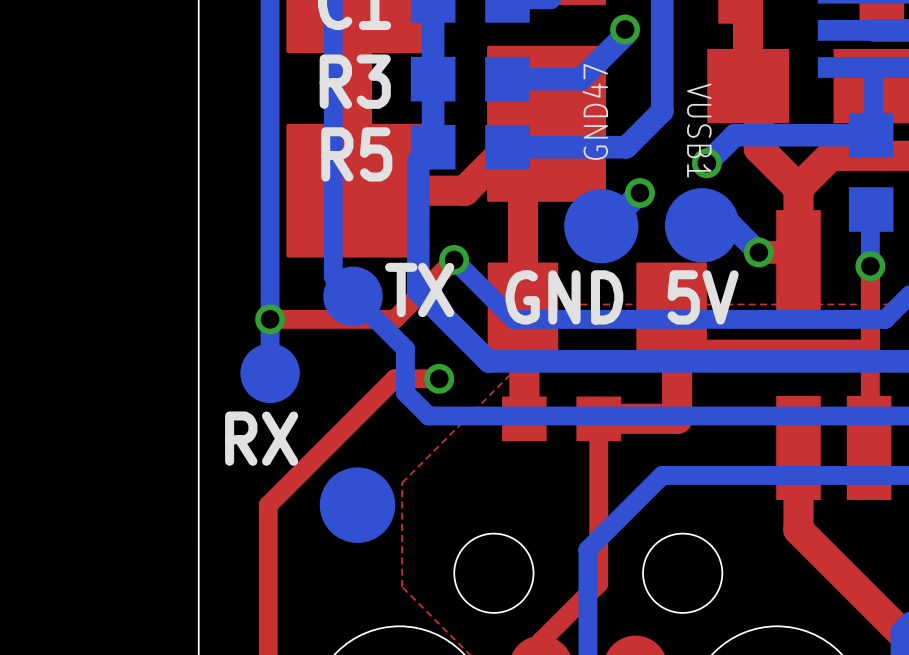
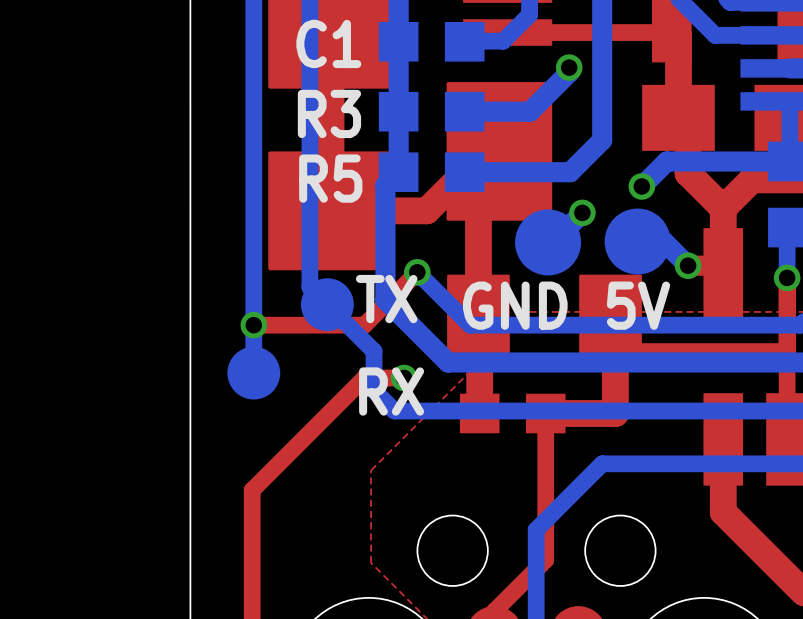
GND47 name: GND47 (595, 111) -> none
VUSB1 name: VUSB1 (699, 130) -> none
text position: RX (261, 438) -> RX (391, 391)
part: (357, 505) -> none

